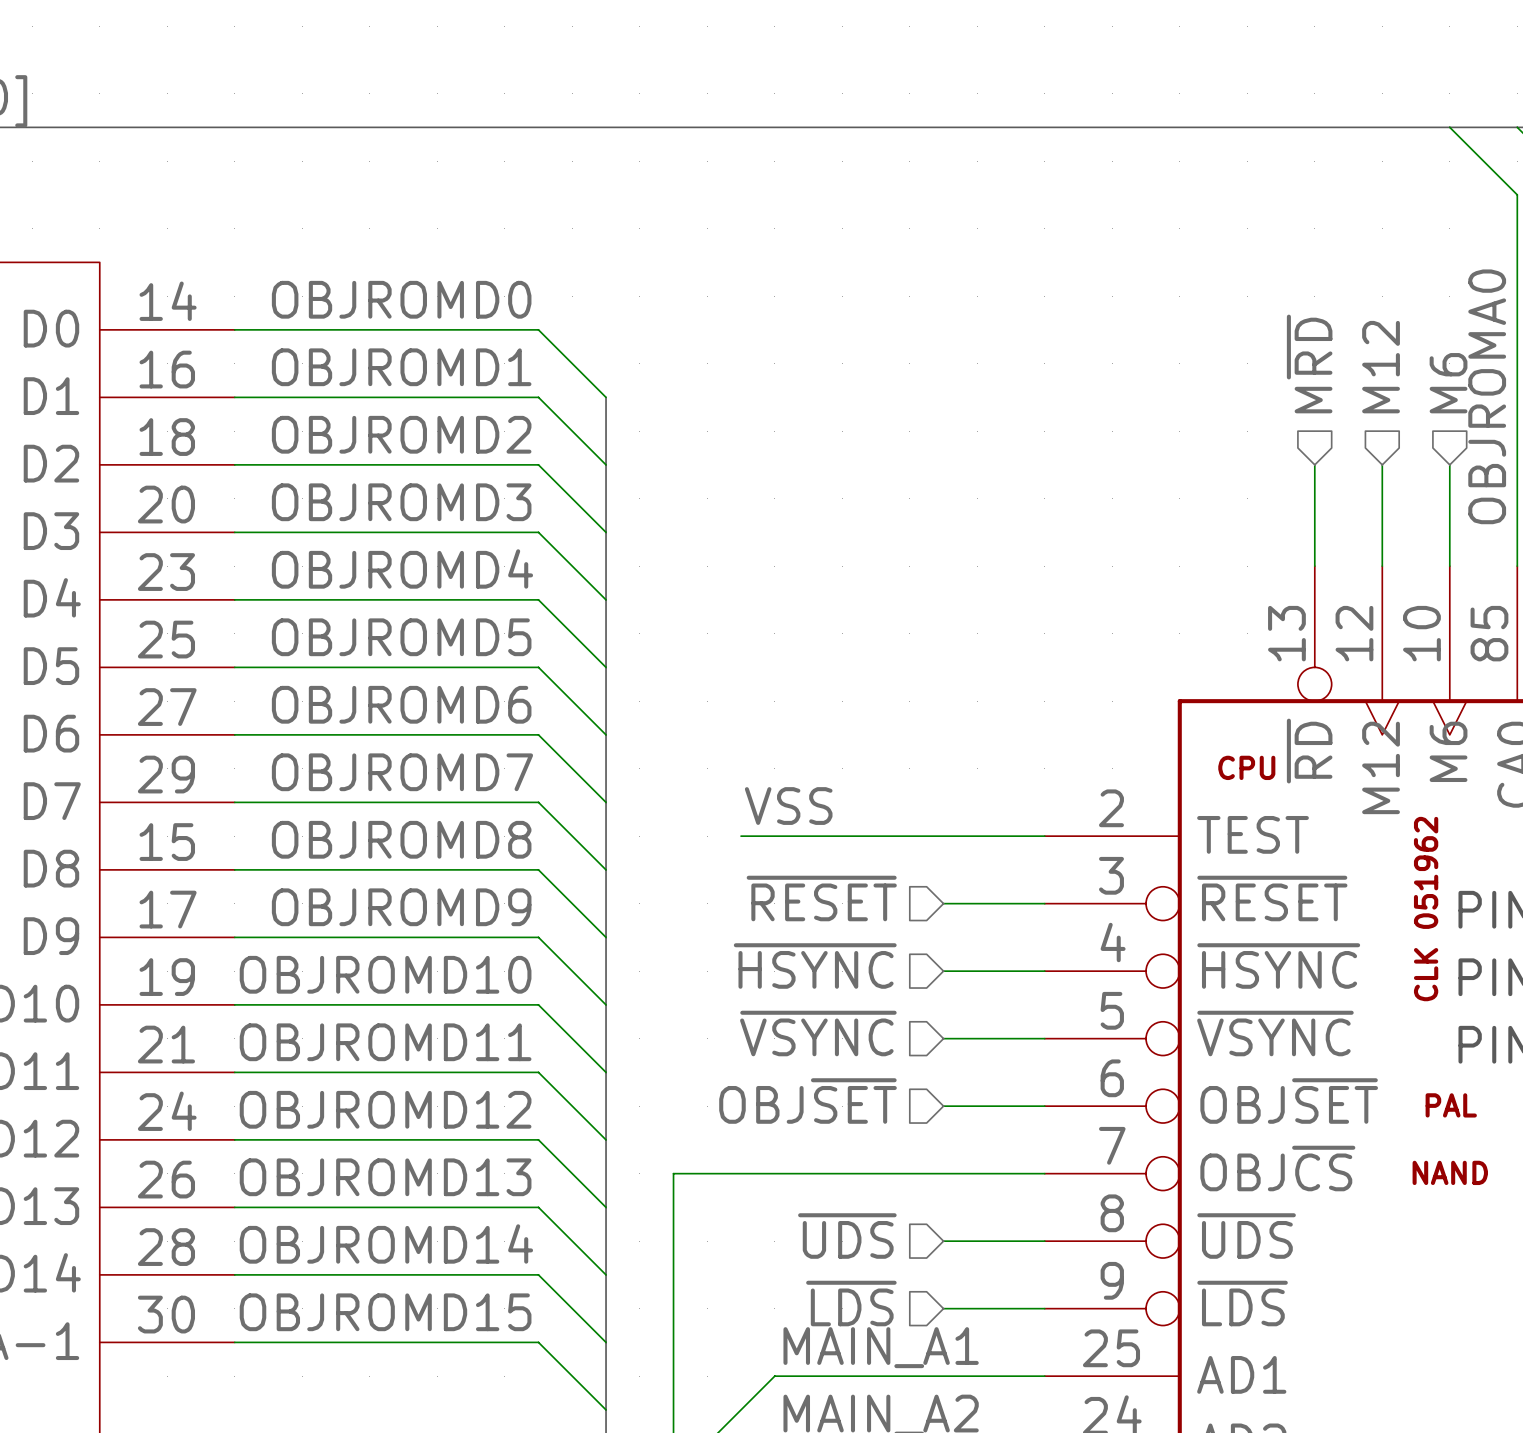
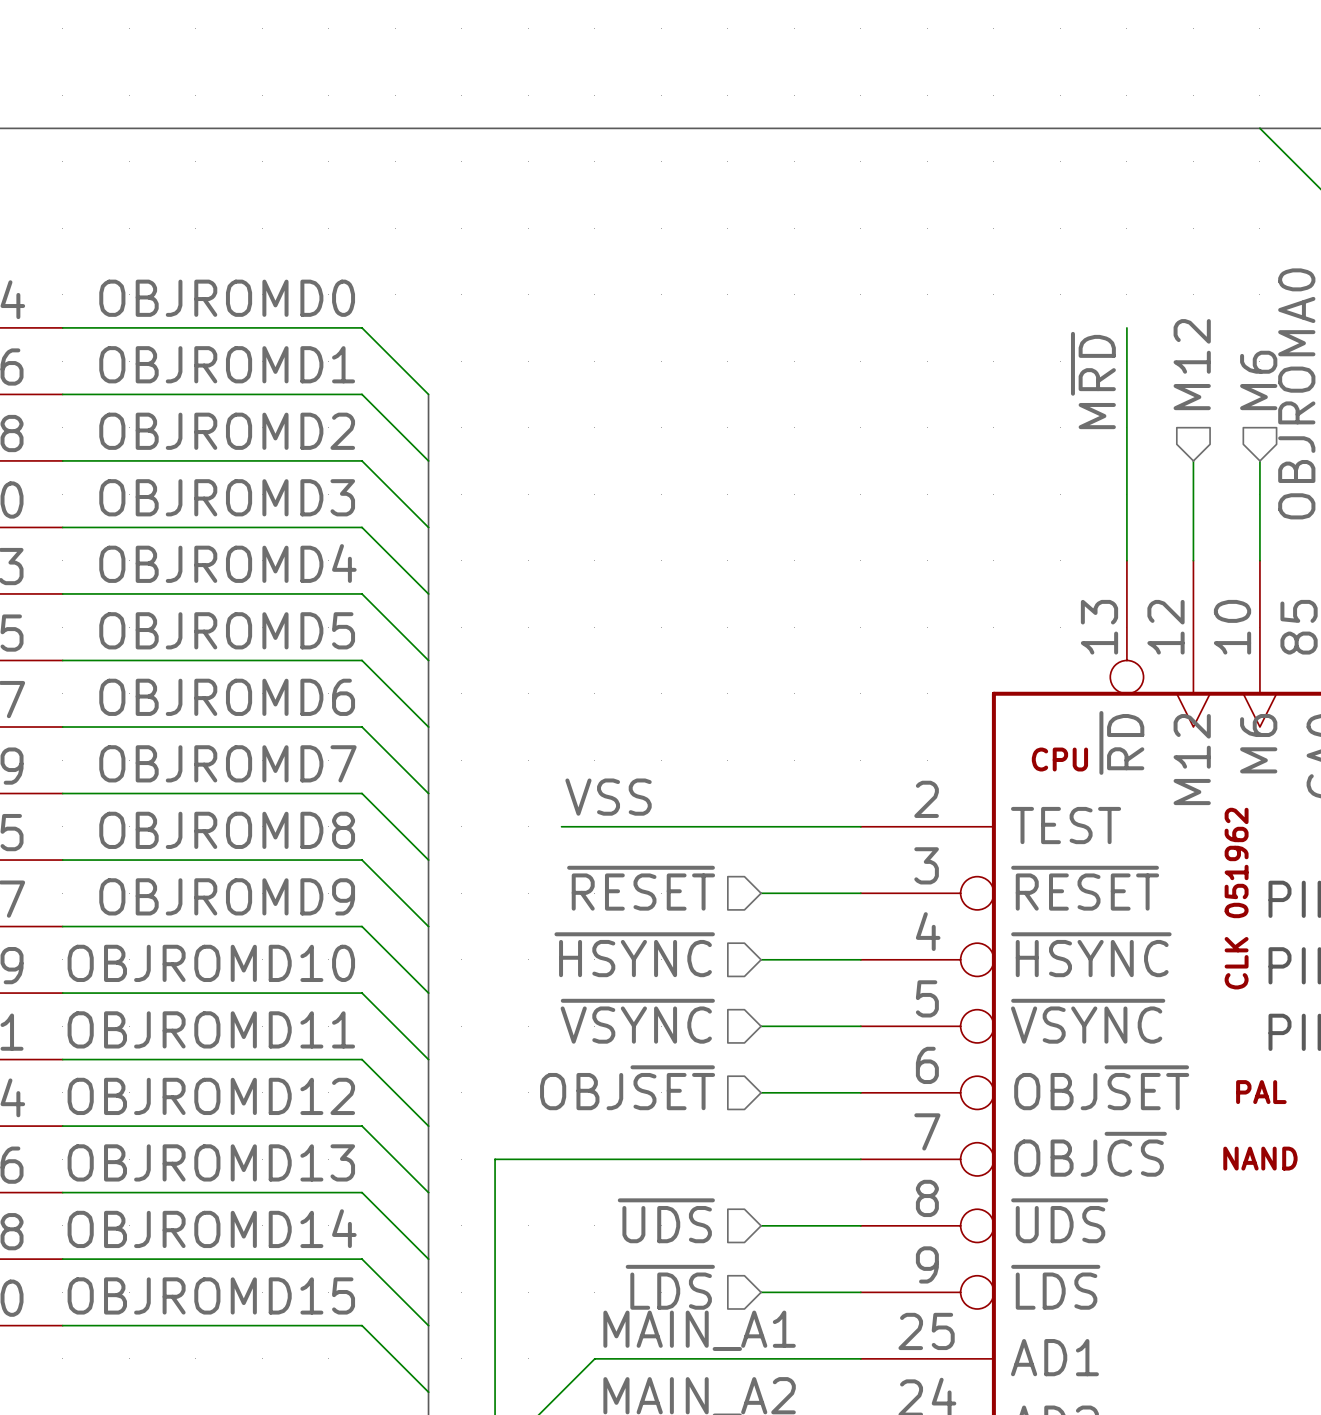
wire: none -> (1126, 327) (1126, 460)
hierarchical label: M~{RD} (1309, 363) -> none
label: none -> M~{RD} (1093, 380)

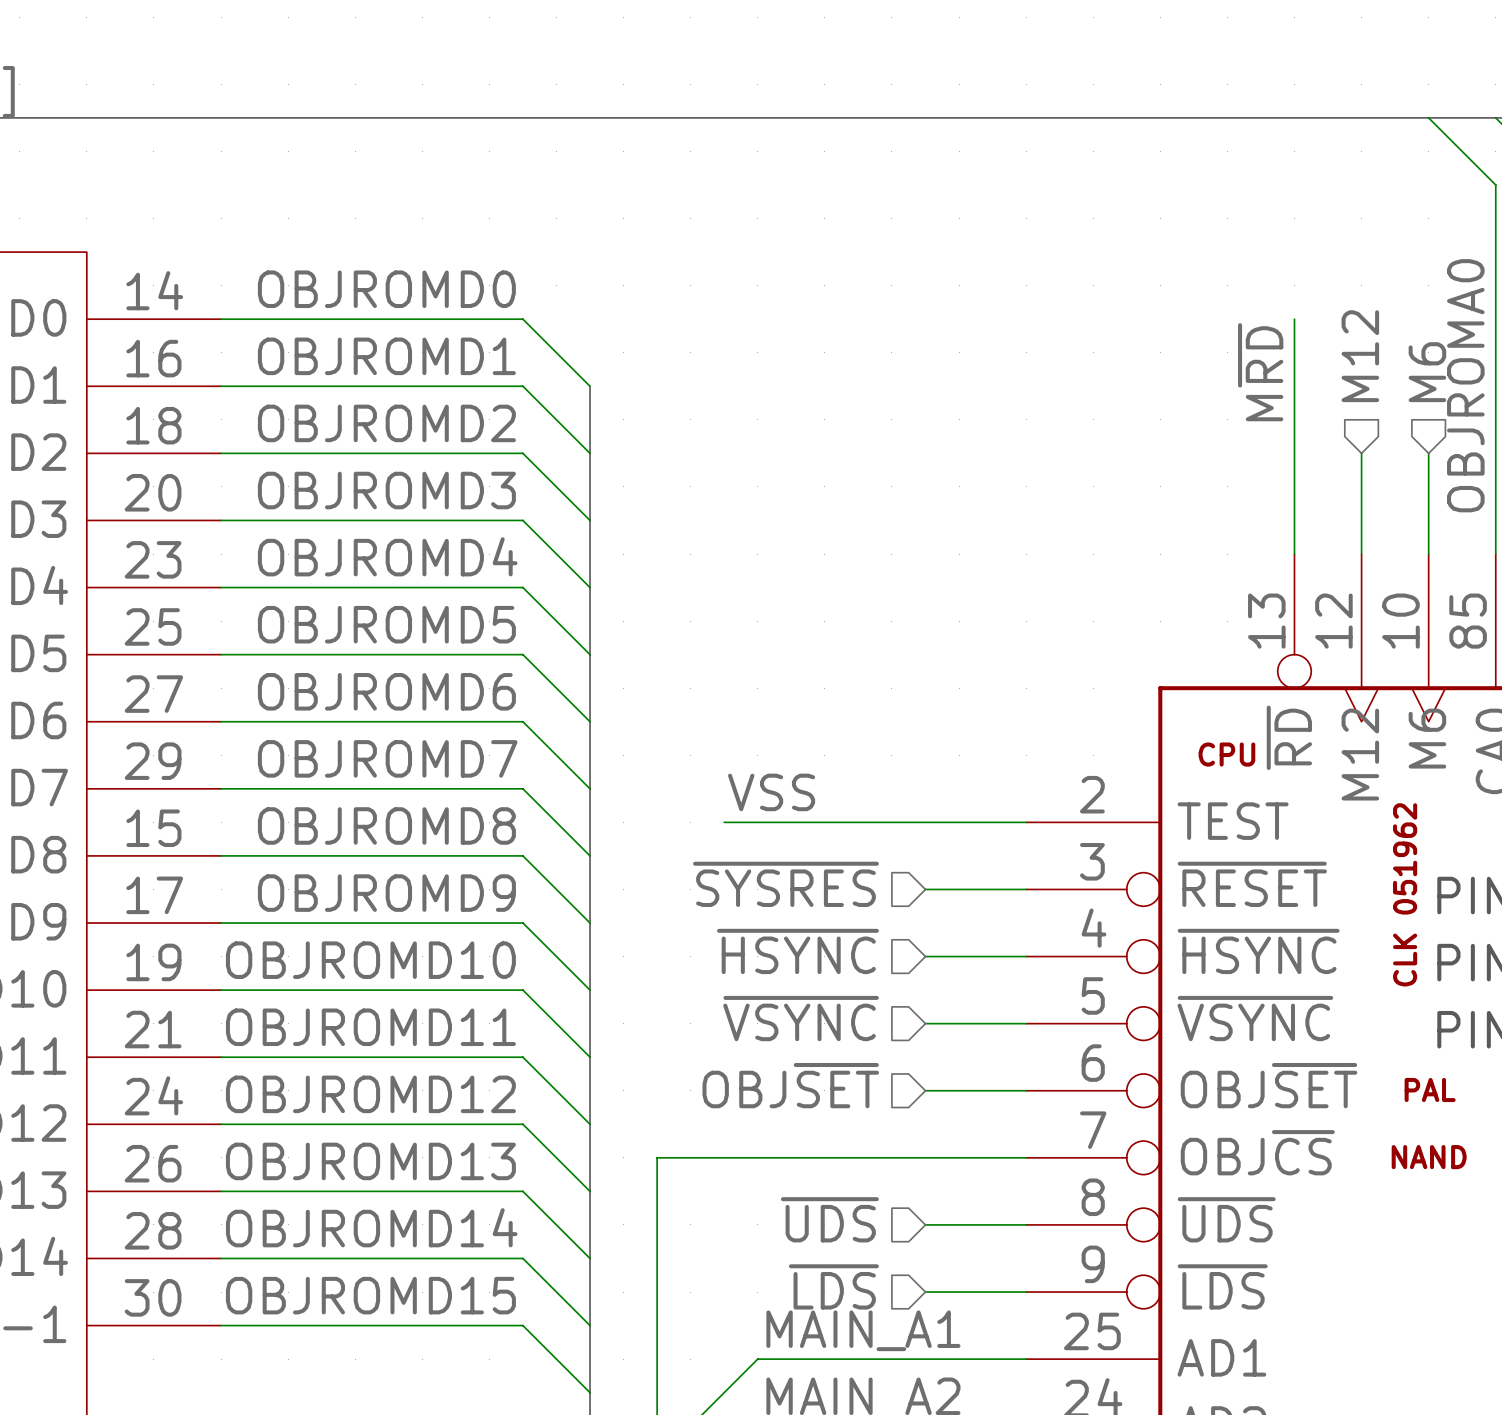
hierarchical label: ~{RESET} (641, 888) -> ~{SYSRES} (785, 884)

